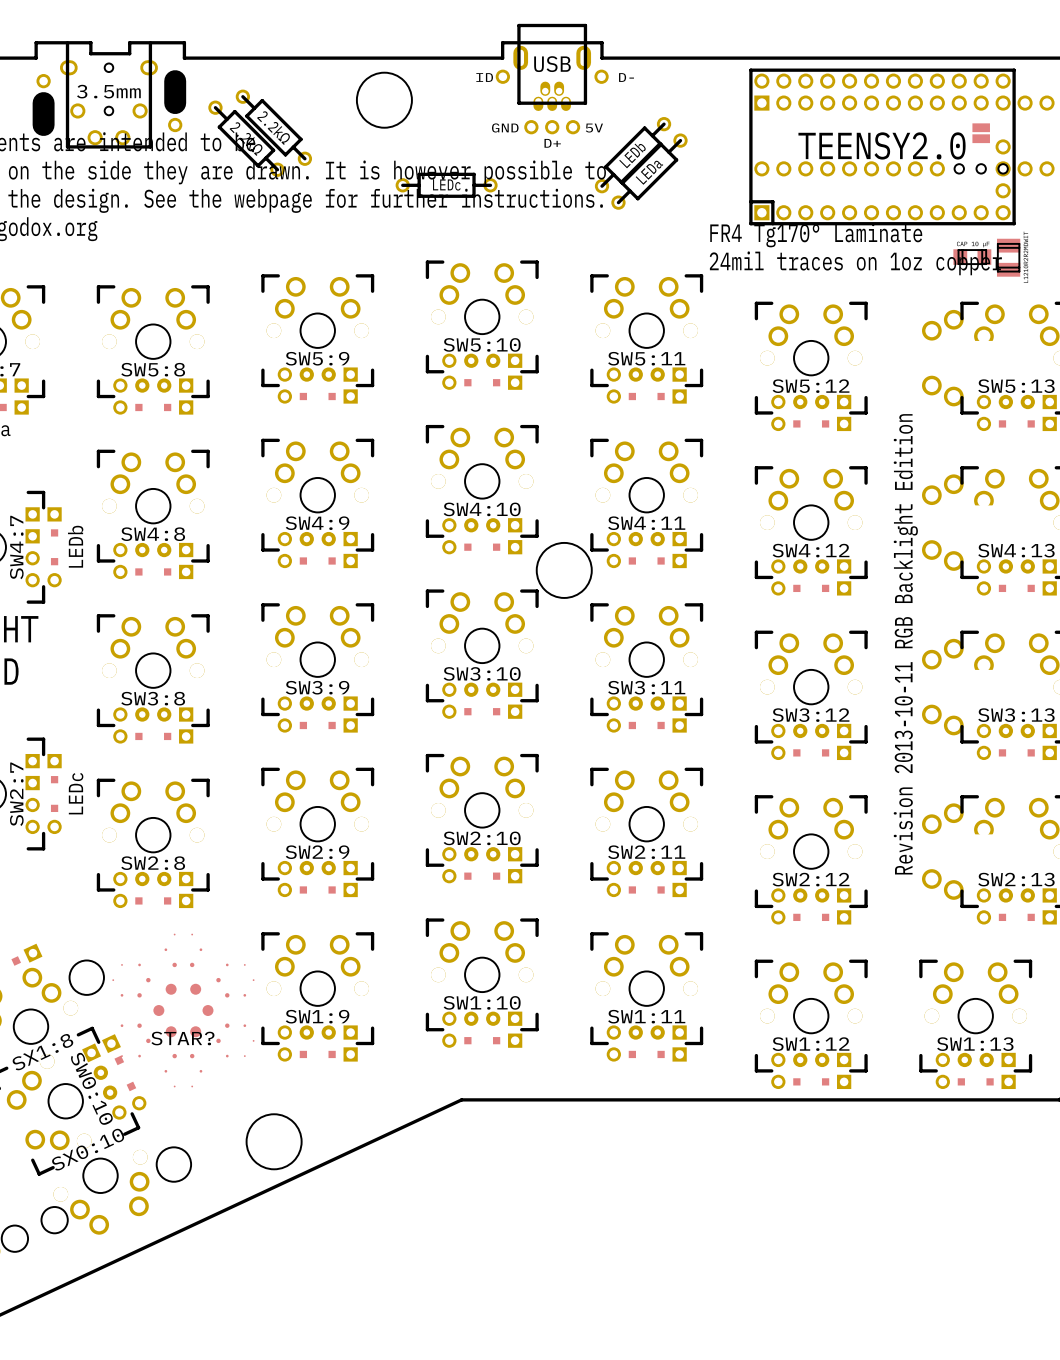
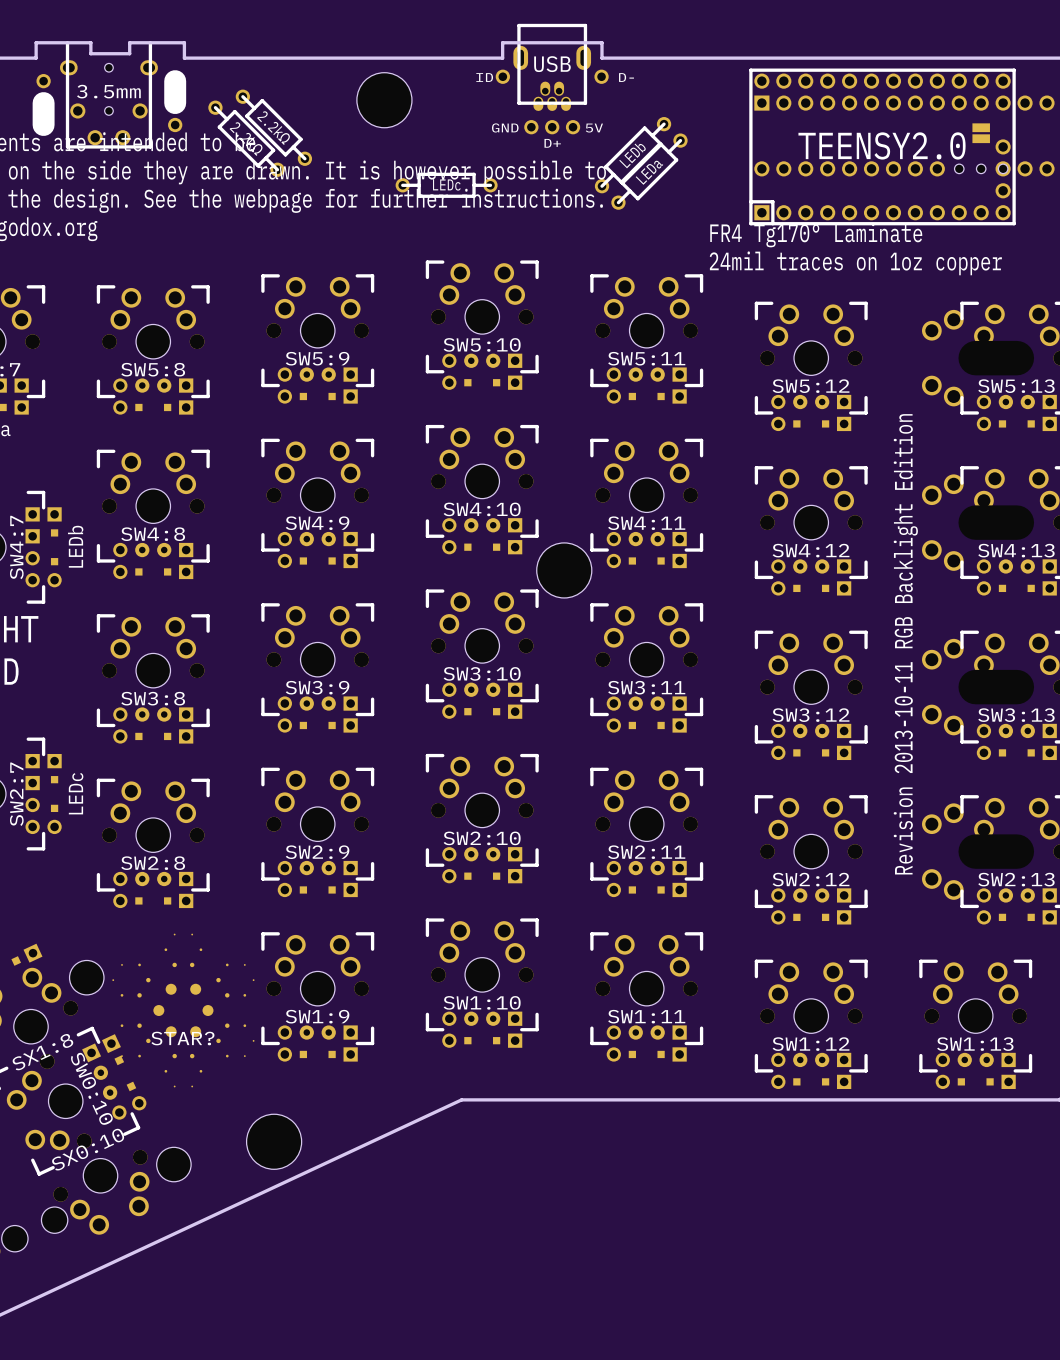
part: (972, 257) -> none
part: (1008, 257) -> none

